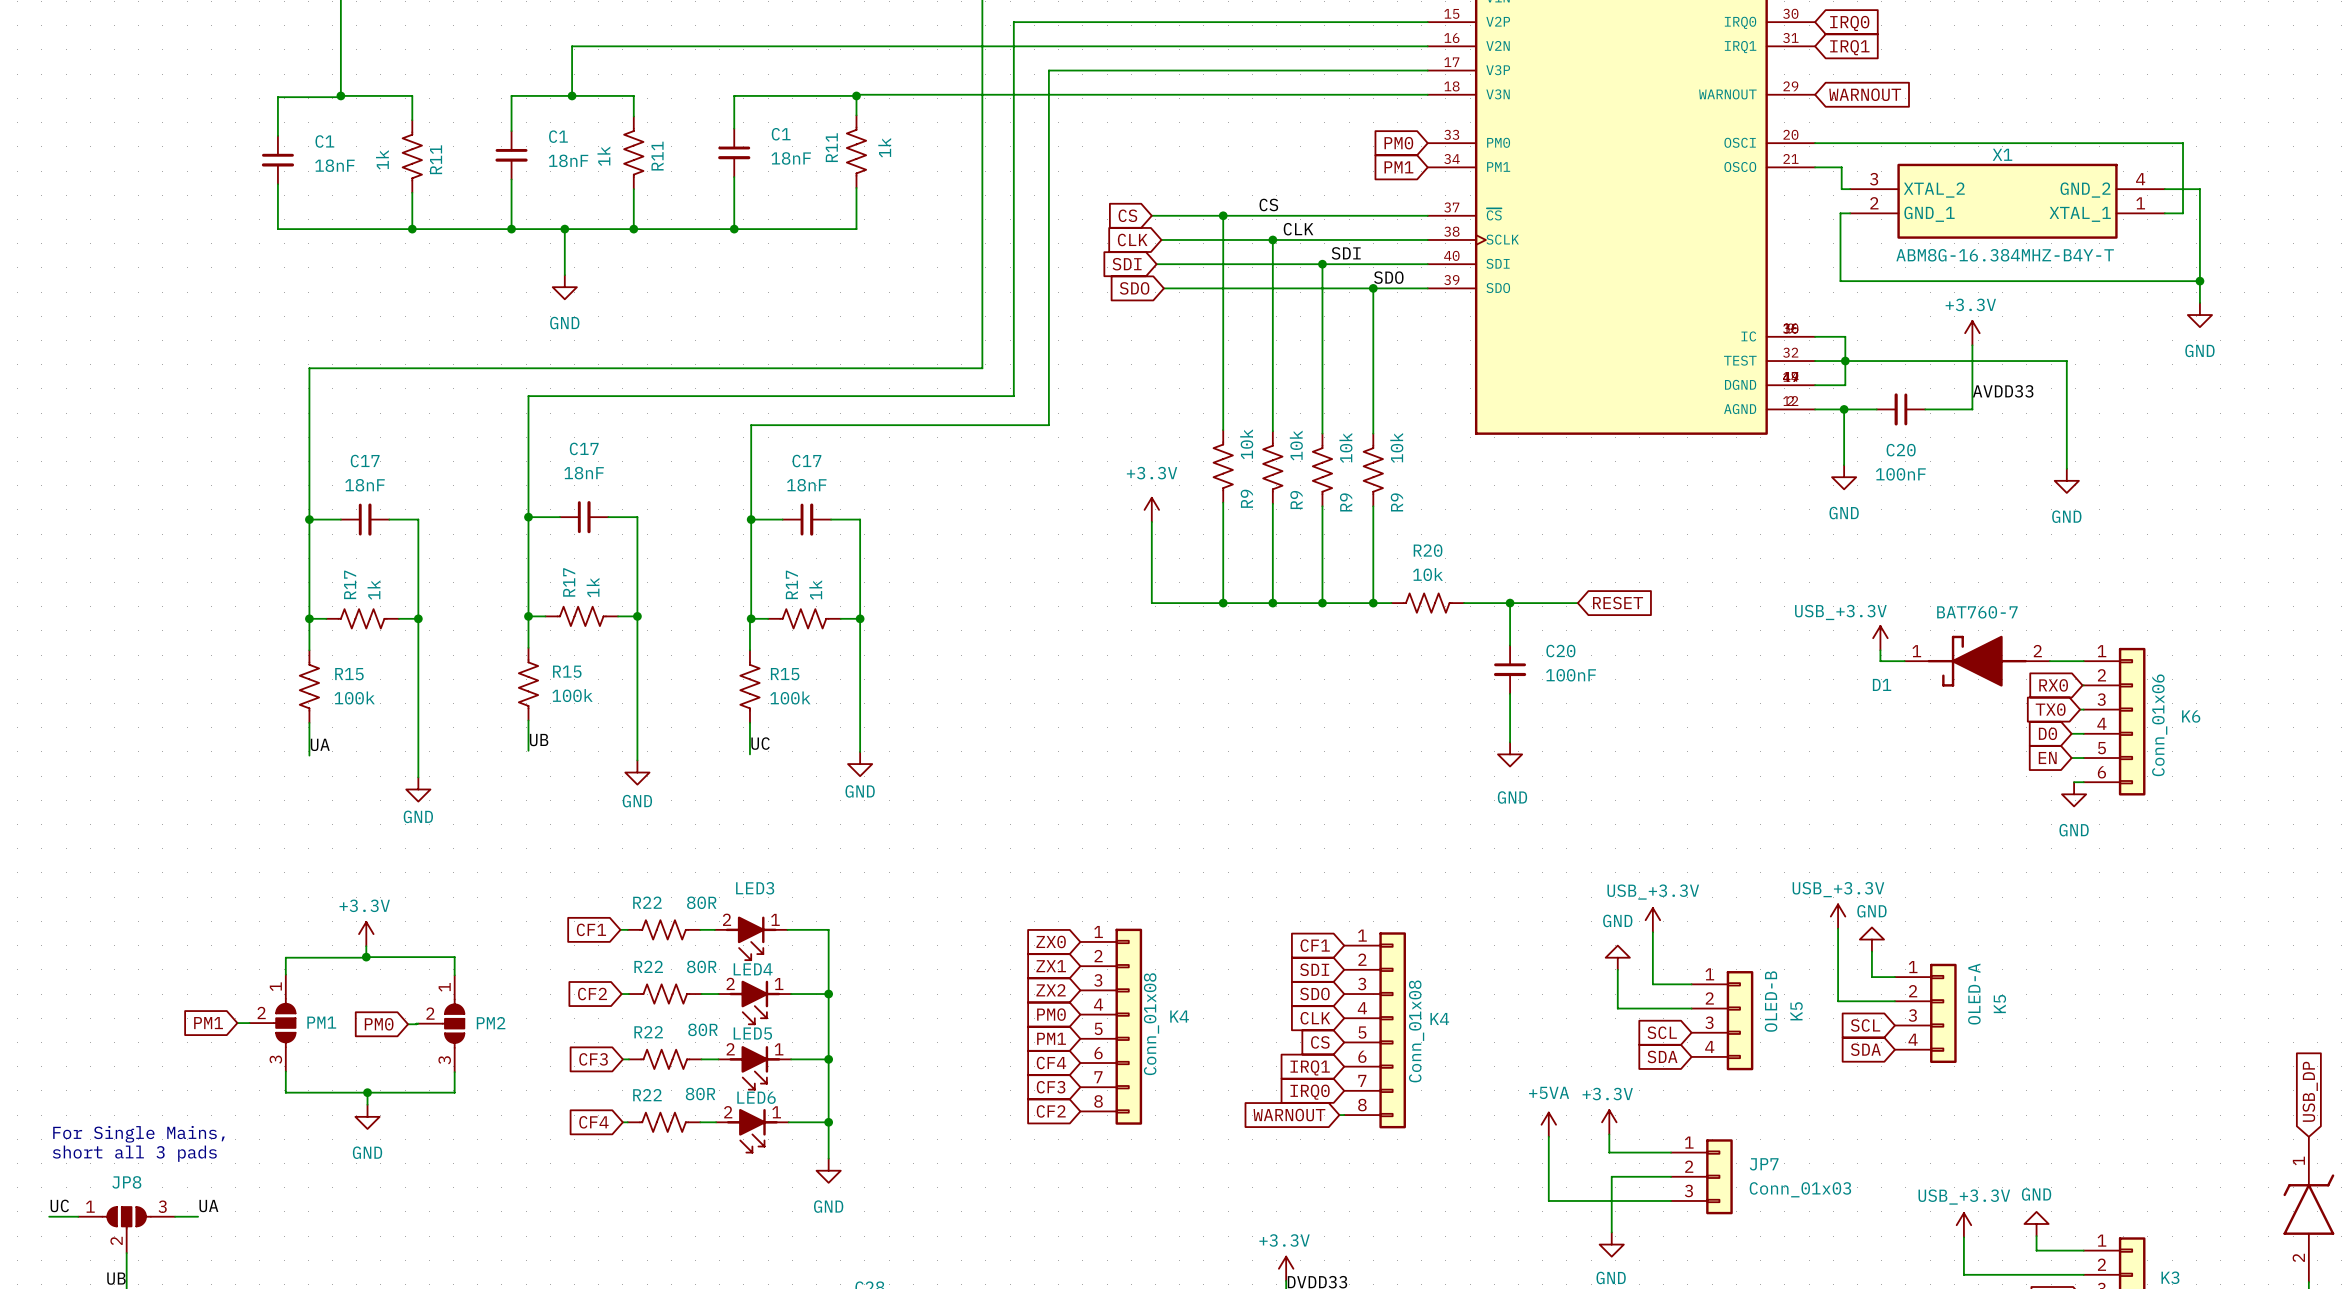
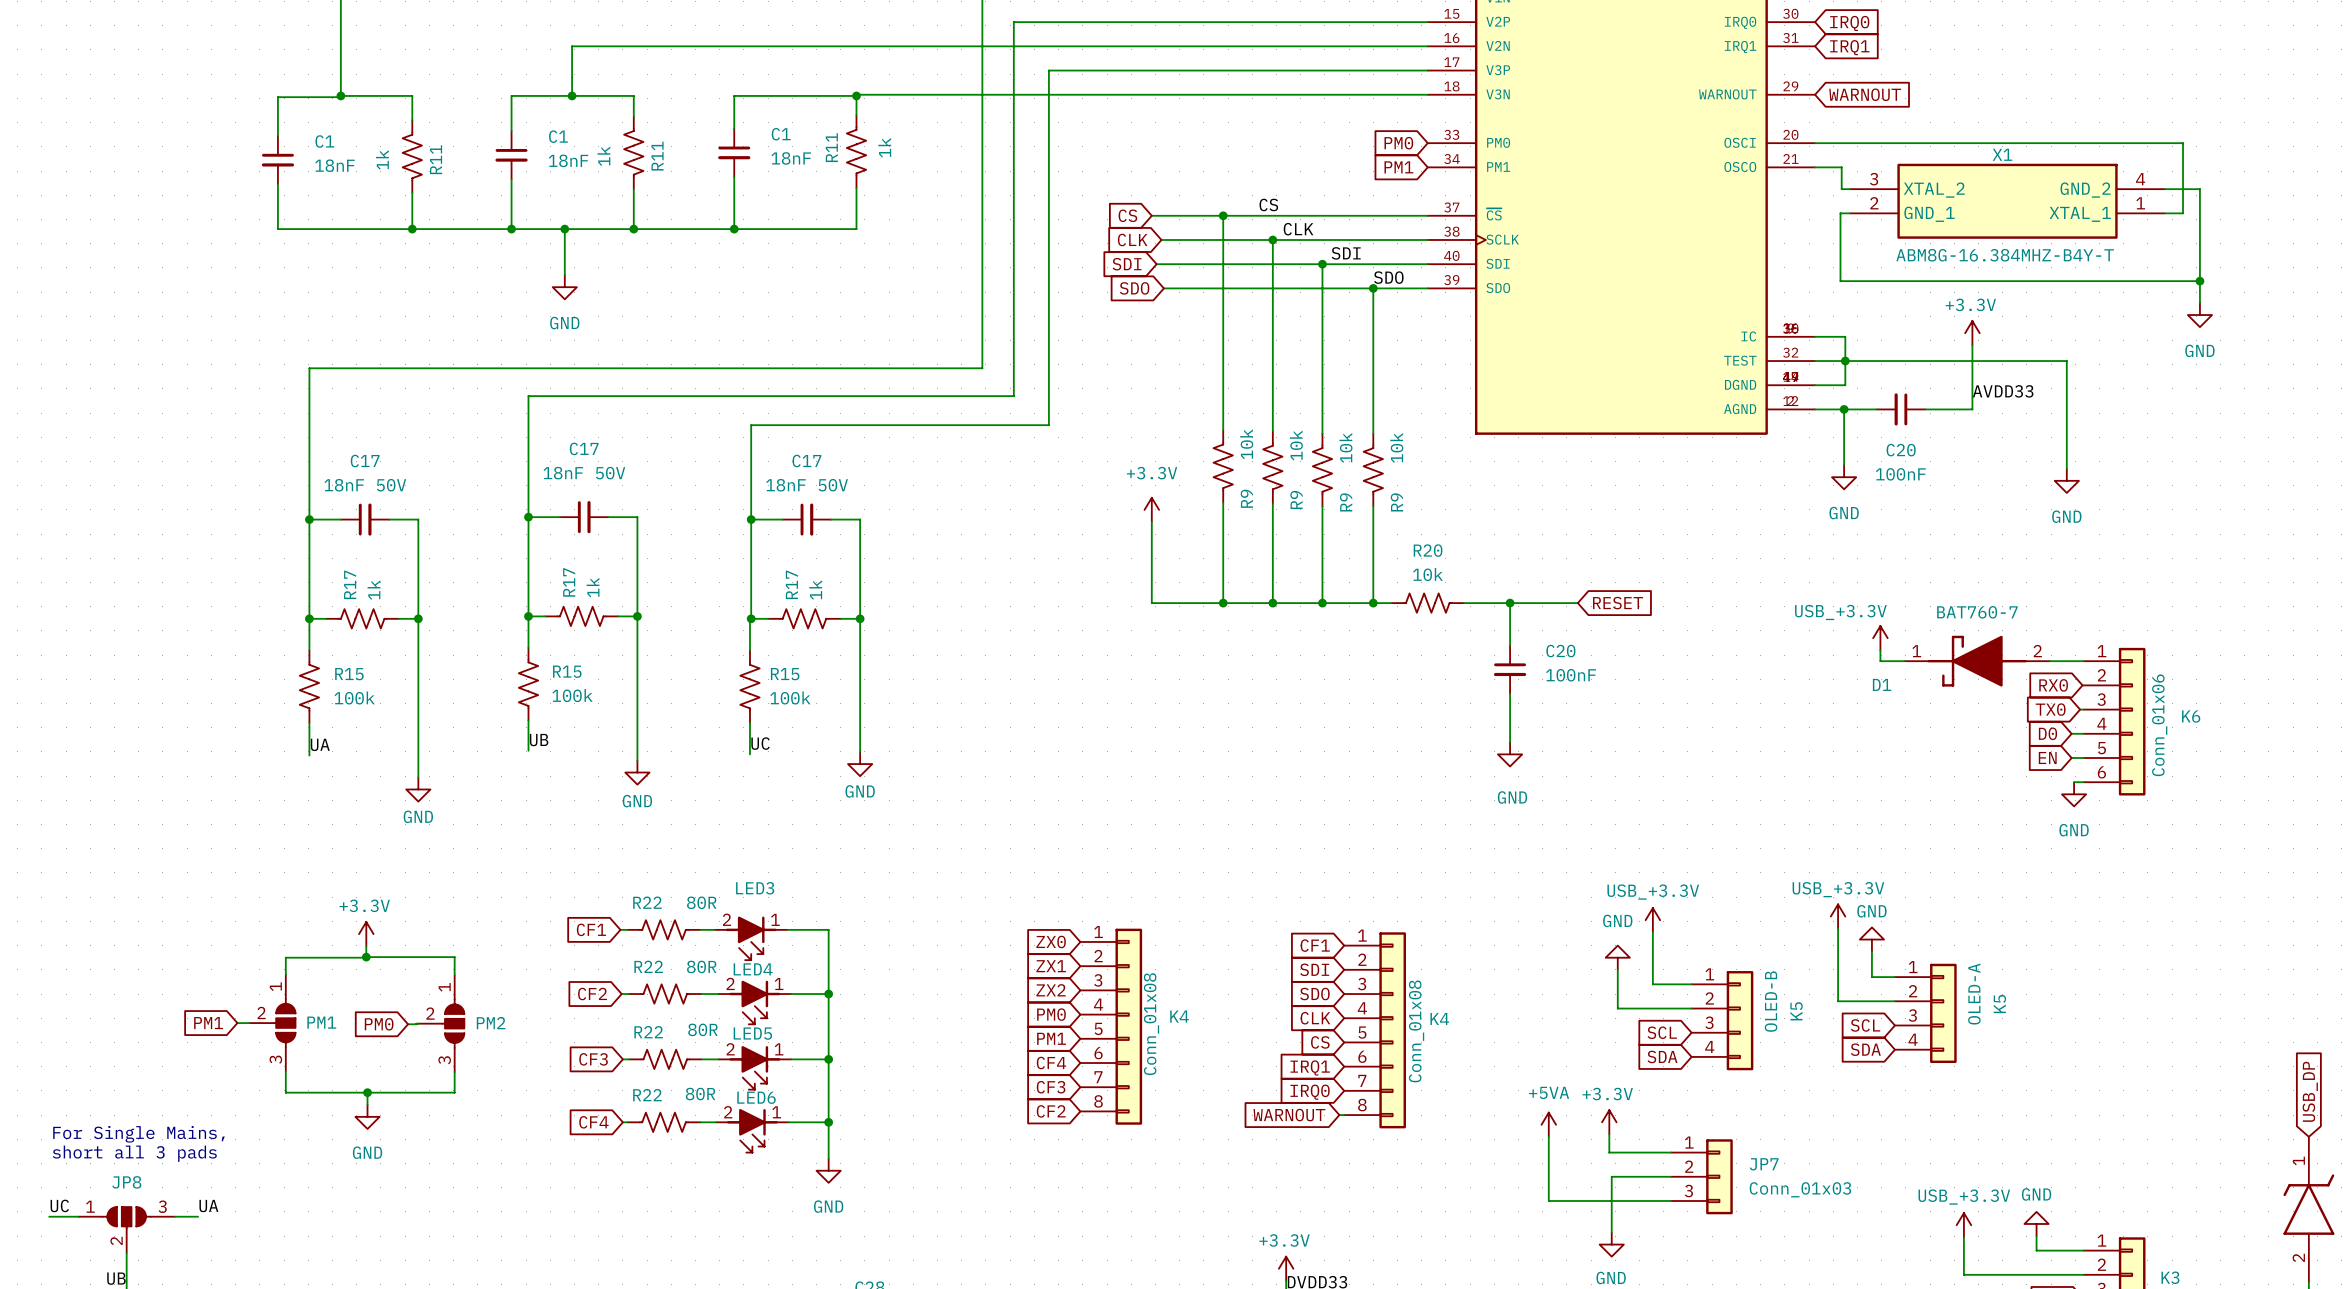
C17 value: 18nF (584, 473) -> 18nF 50V (584, 473)
C17 value: 18nF (365, 485) -> 18nF 50V (365, 485)
C17 value: 18nF (806, 485) -> 18nF 50V (807, 485)

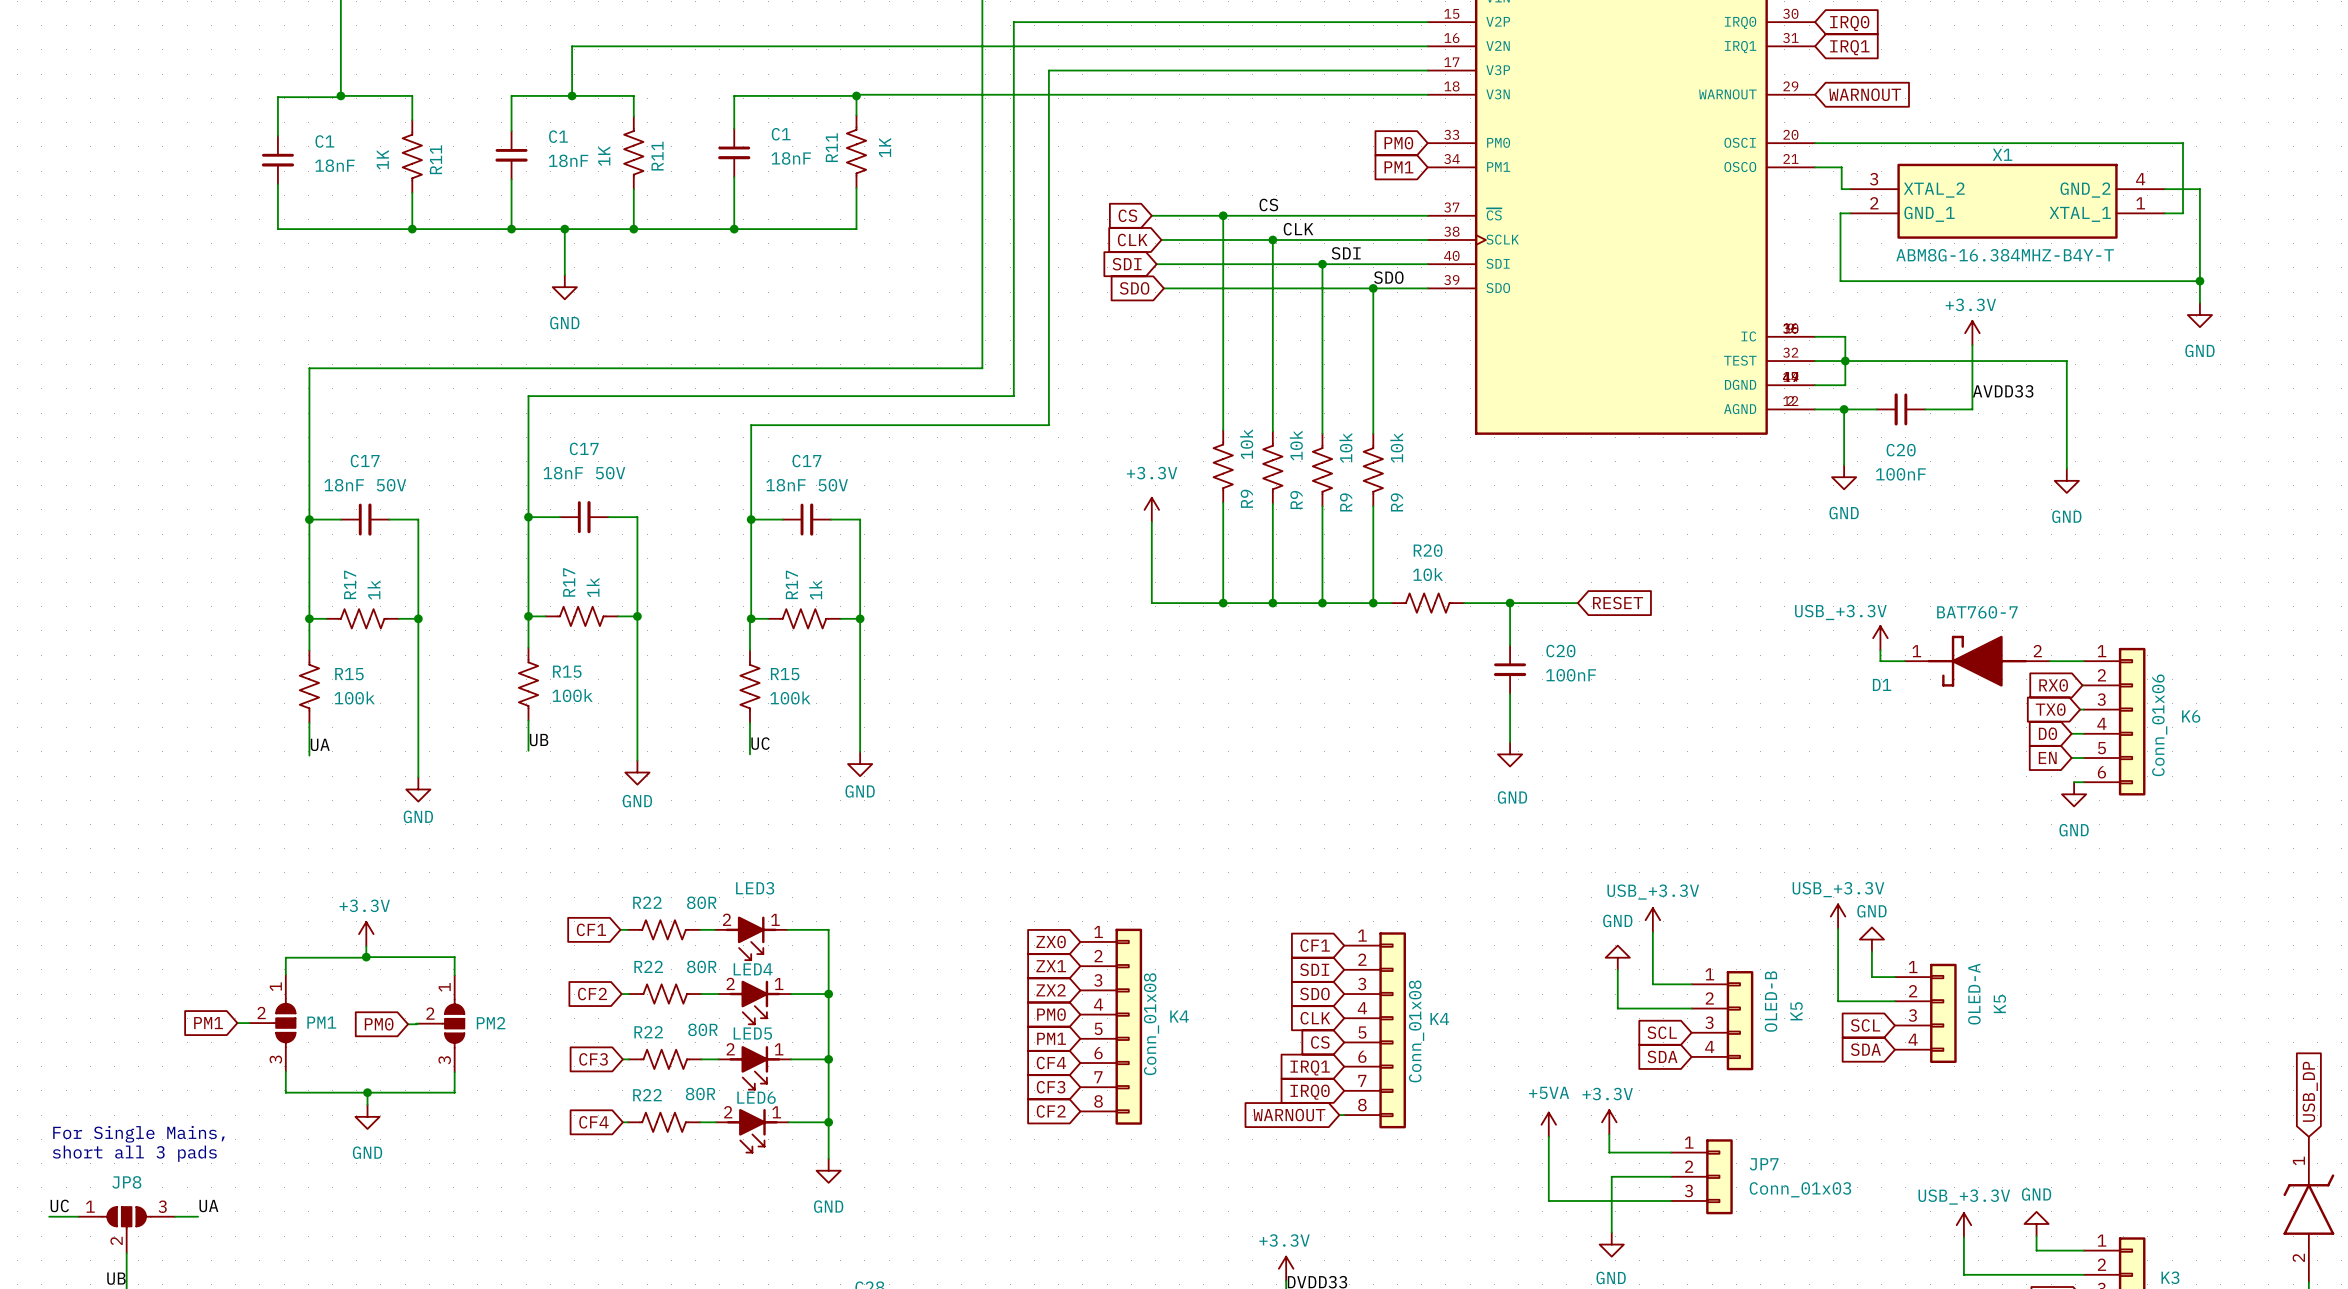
R11 value: 1k (884, 147) -> 1K (885, 147)
R11 value: 1k (603, 156) -> 1K (604, 156)
R11 value: 1k (382, 159) -> 1K (382, 159)

